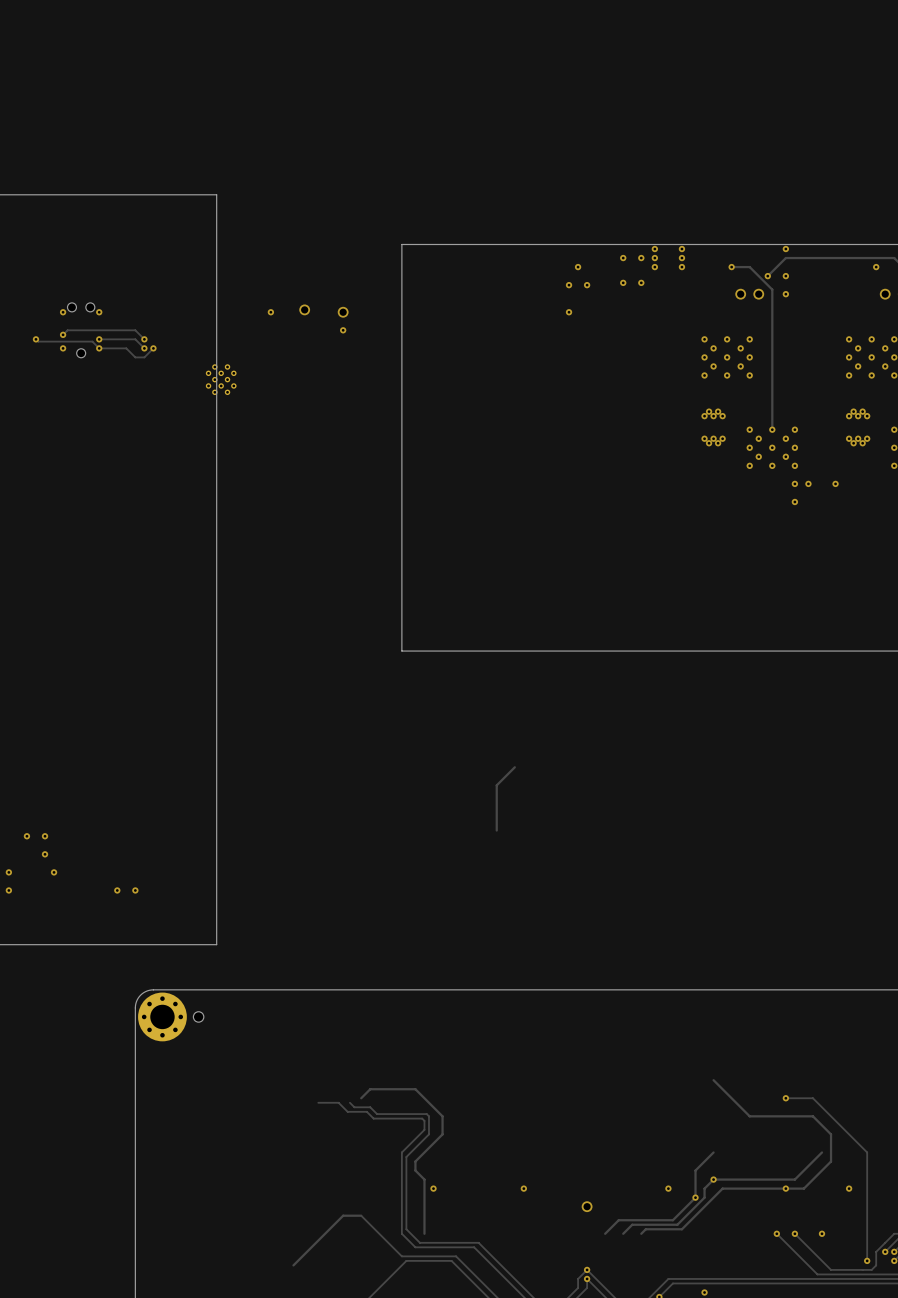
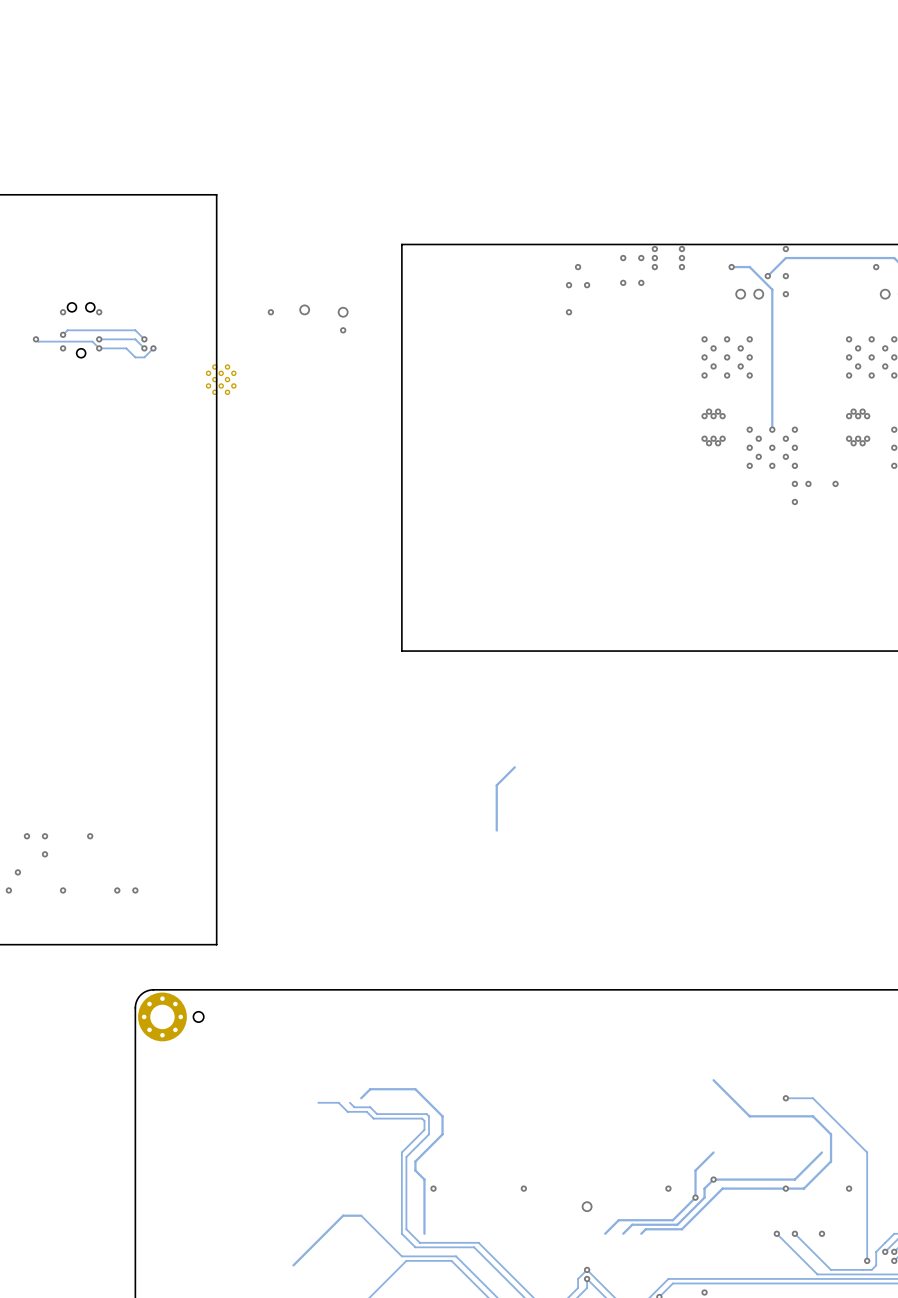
via: none -> (90, 836)
via: (8, 872) -> none
via: none -> (17, 872)
via: (54, 872) -> none
via: none -> (63, 890)

